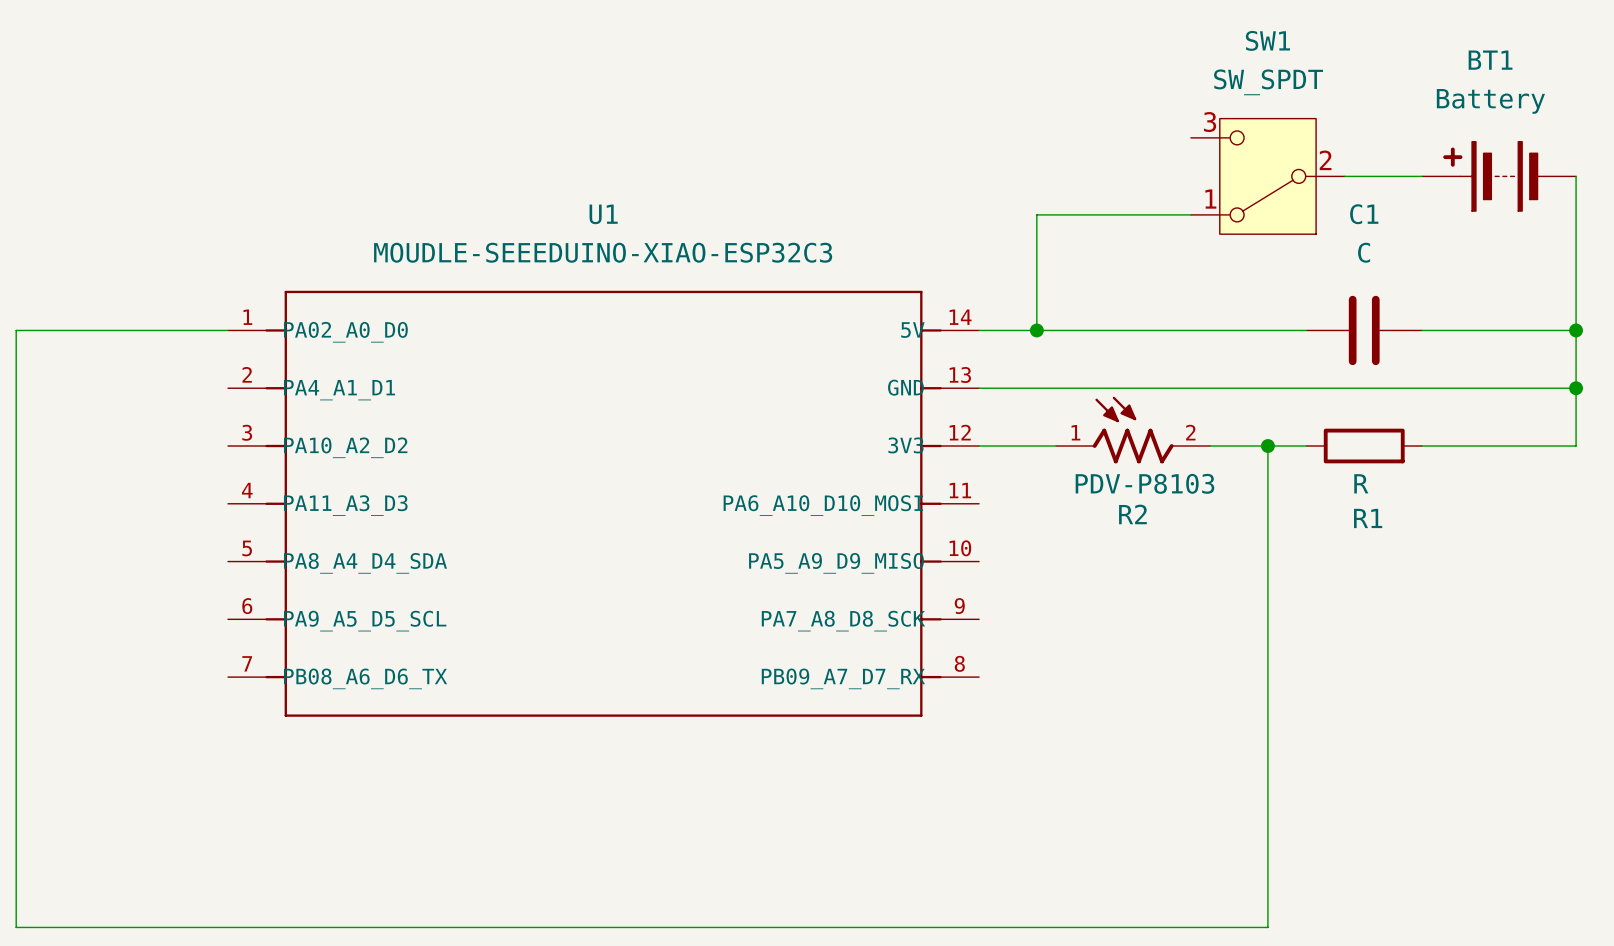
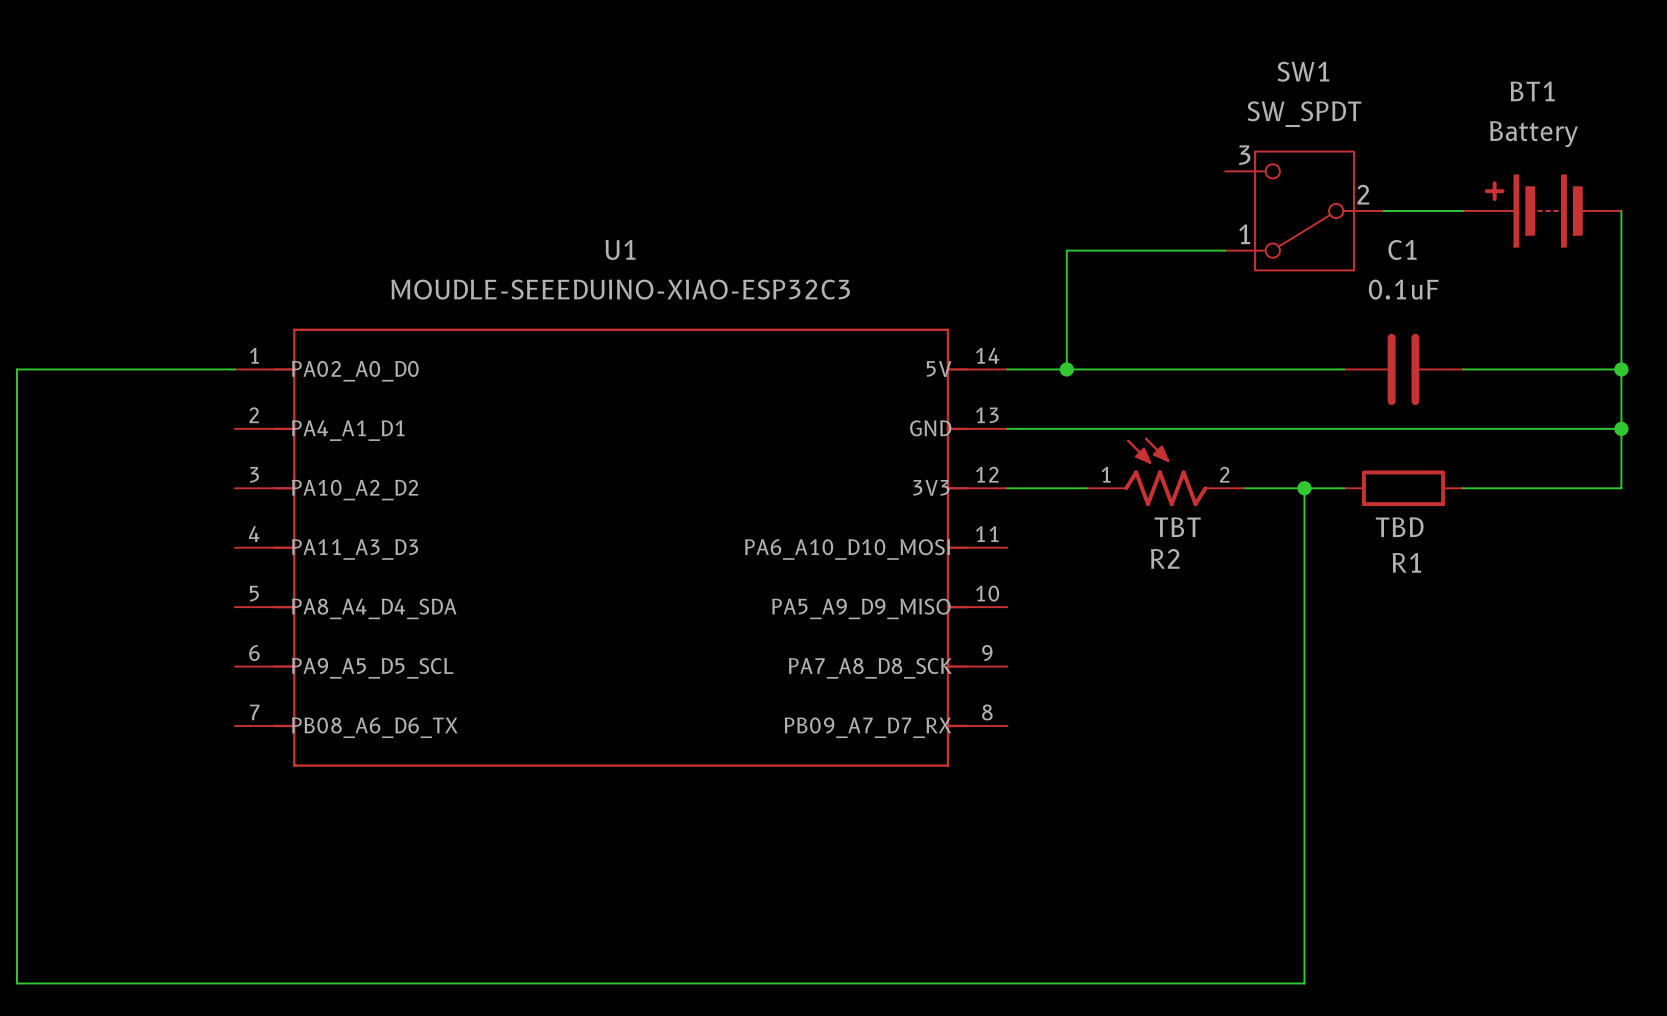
C1 value: C (1364, 252) -> 0.1uF (1403, 289)
R2 value: PDV-P8103 (1144, 483) -> TBT (1177, 527)
R1 value: R (1361, 483) -> TBD (1399, 527)

